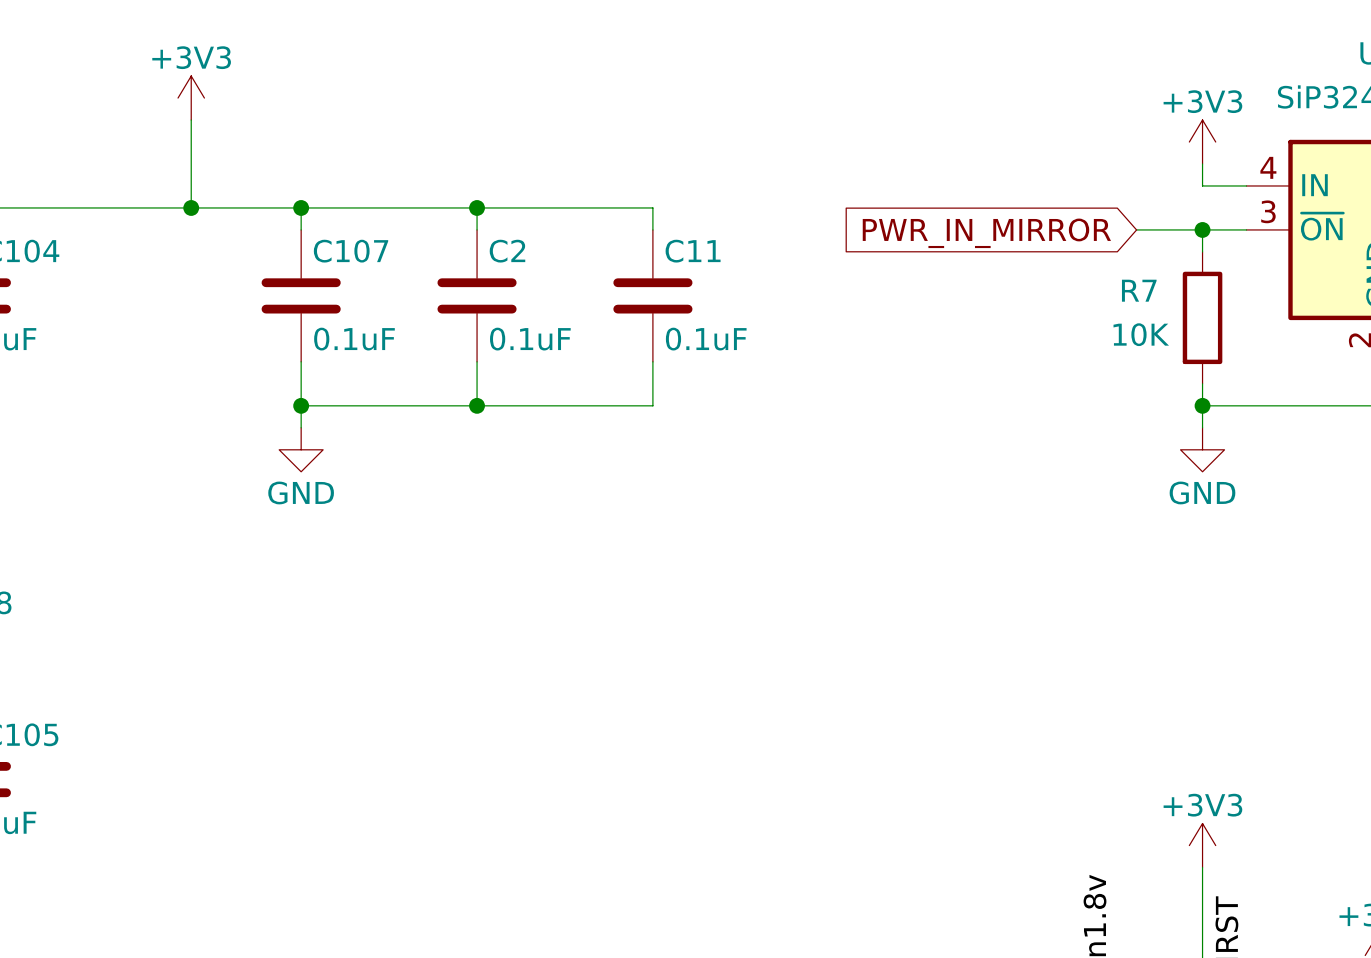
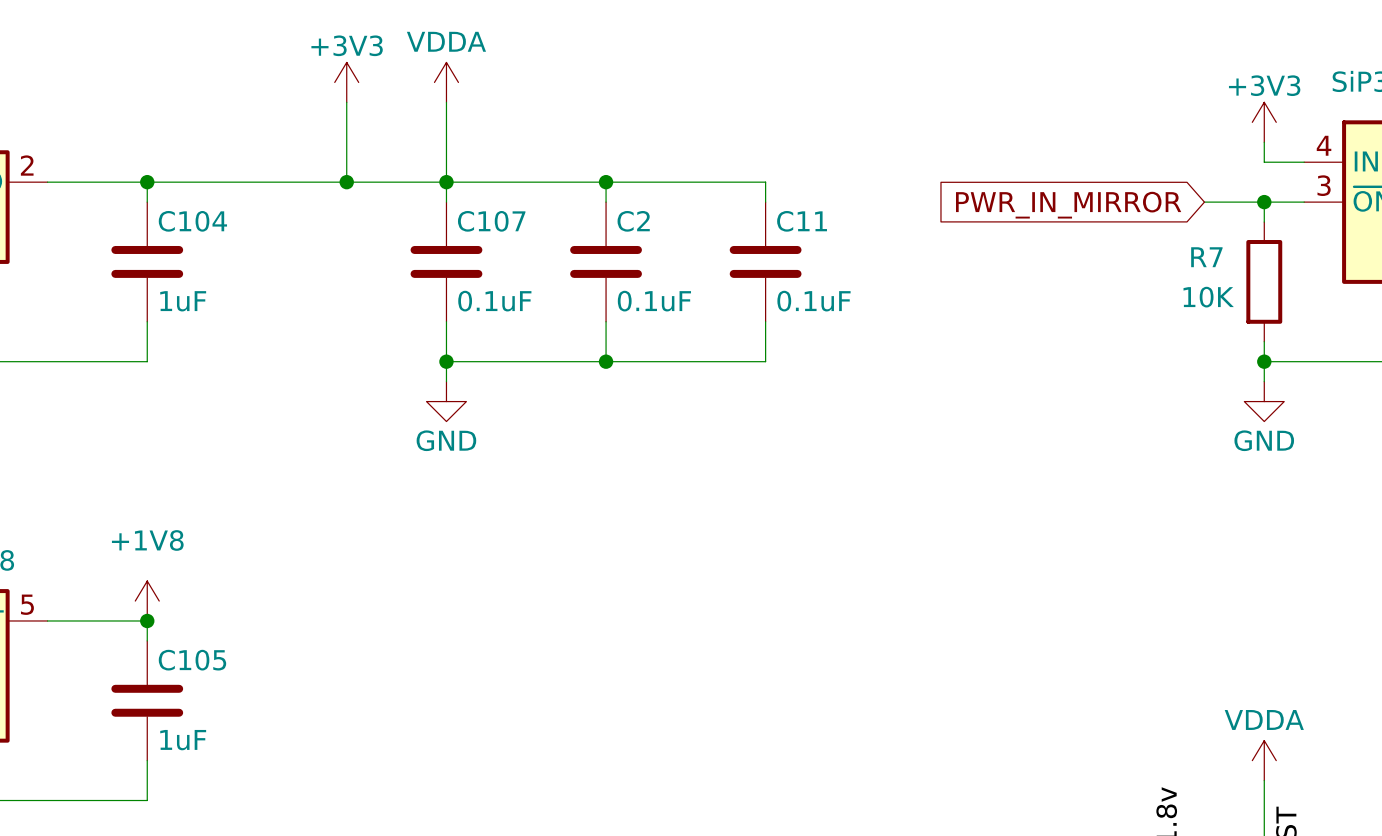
power symbol: none -> VDDA (446, 82)
wire: none -> (446, 102) (446, 182)
power symbol: +3V3 (1202, 845) -> VDDA (1264, 760)

